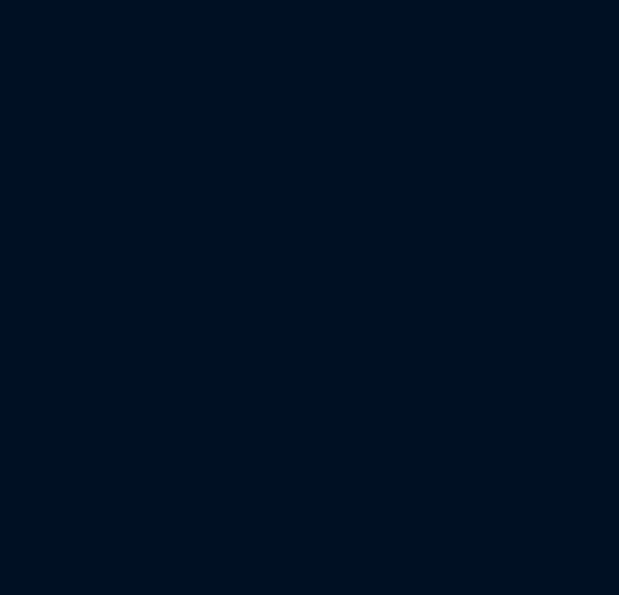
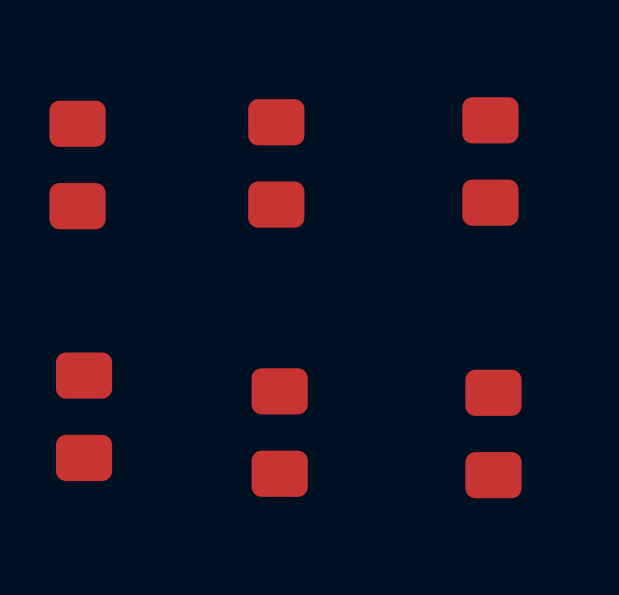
part: none -> (490, 161)
part: none -> (276, 163)
part: none -> (77, 164)
part: none -> (84, 416)
part: none -> (279, 432)
part: none -> (493, 433)

